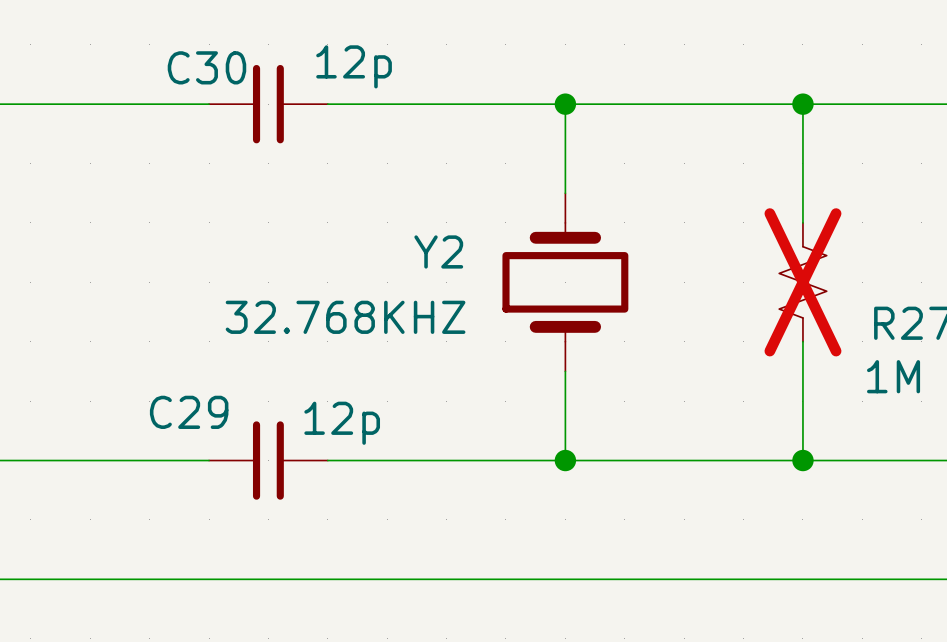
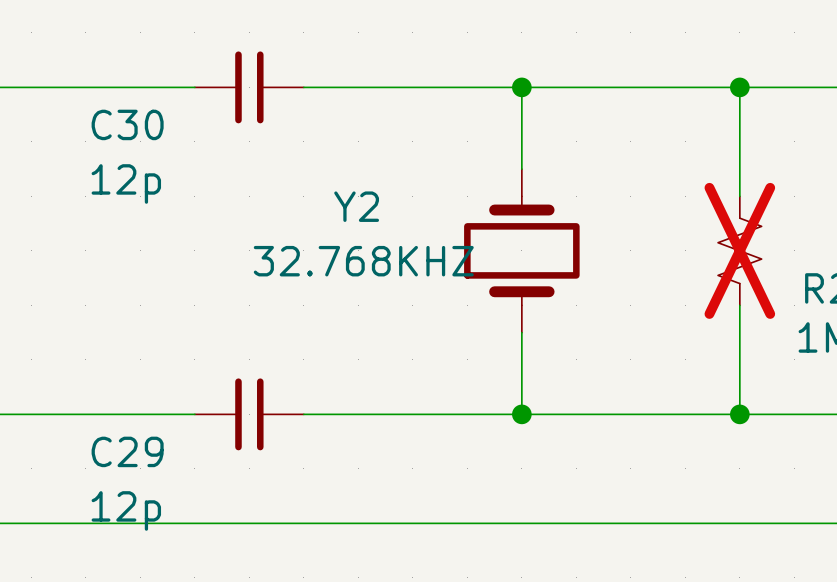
C30 value position: 12p (354, 66) -> 12p (126, 183)
C30 name position: C30 (206, 67) -> C30 (127, 124)
Y2 name position: Y2 (438, 251) -> Y2 (356, 206)
Y2 value position: 32.768KHZ (345, 317) -> 32.768KHZ (363, 261)
C29 name position: C29 (189, 412) -> C29 (127, 451)
C29 value position: 12p (342, 423) -> 12p (126, 510)

